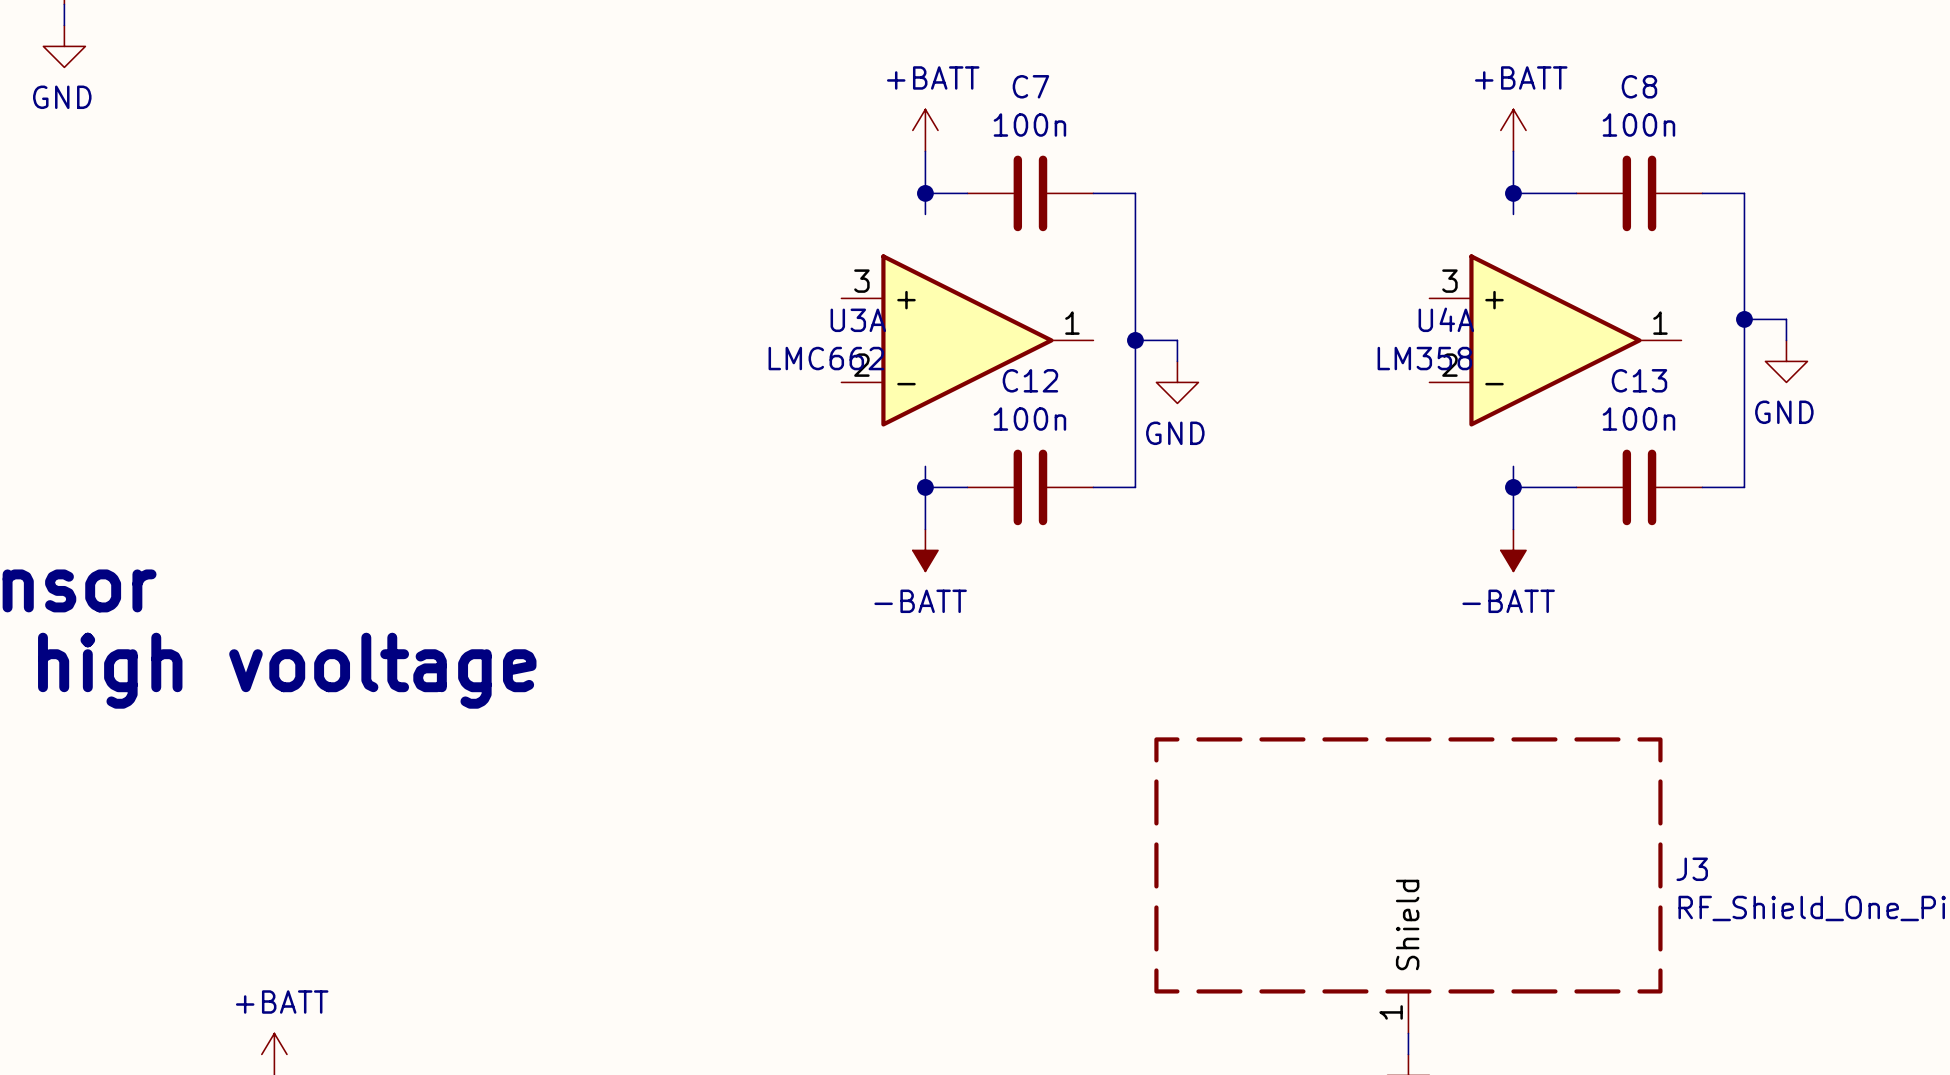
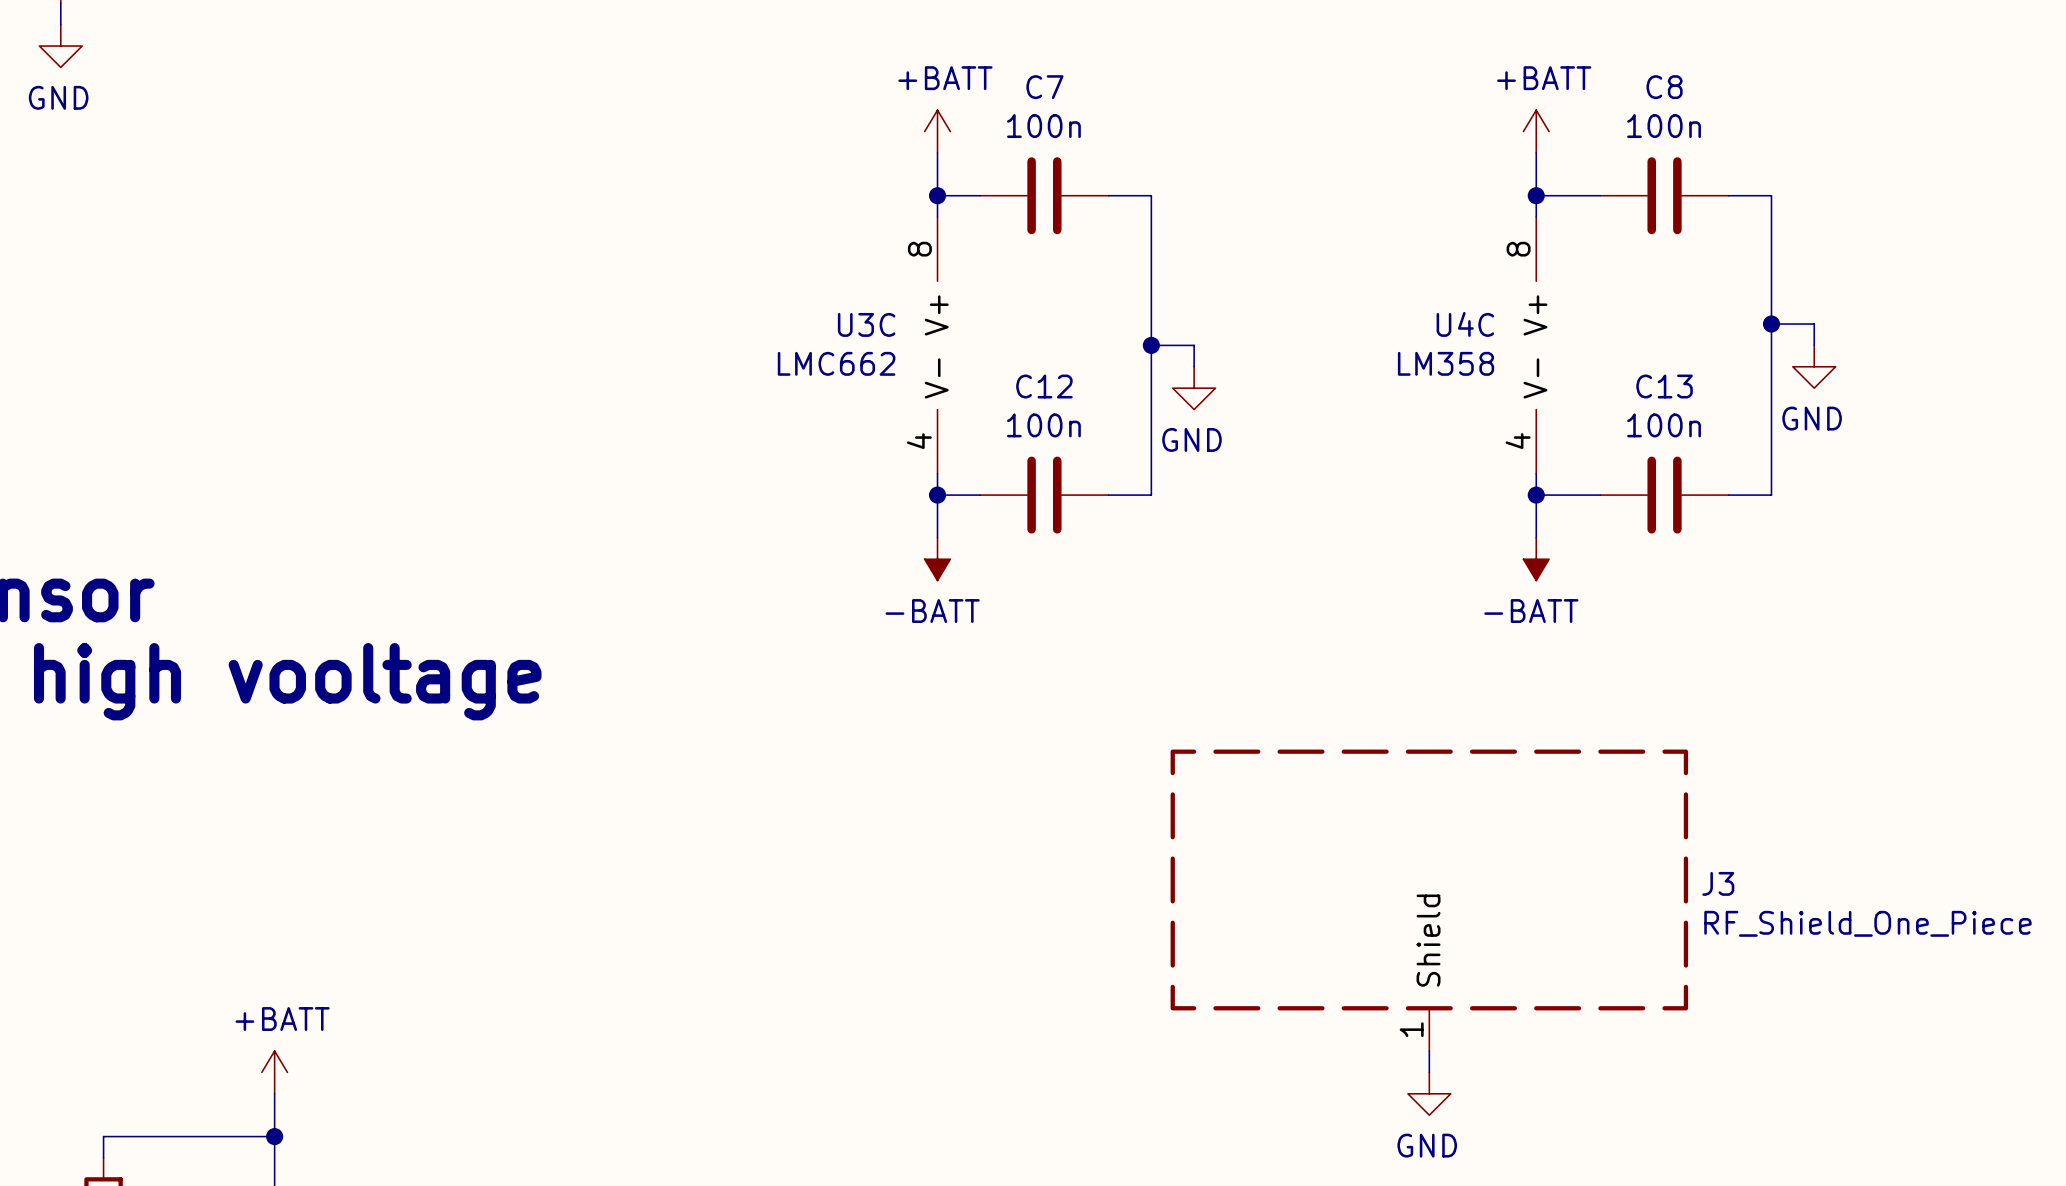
U3C: none -> LMC662 (937, 345)
U3A: LMC662 (967, 340) -> none
U4C: none -> LM358 (1536, 345)
U4A: LM358 (1555, 340) -> none

